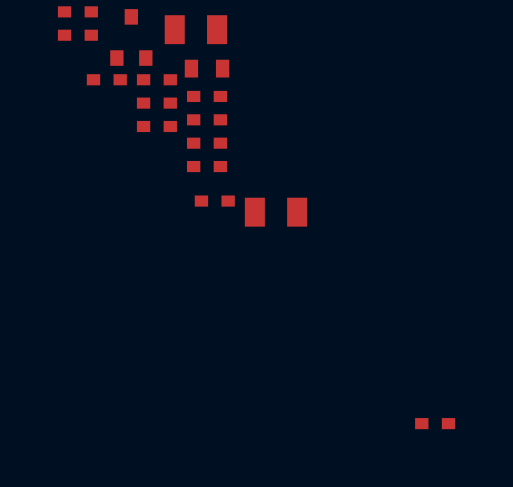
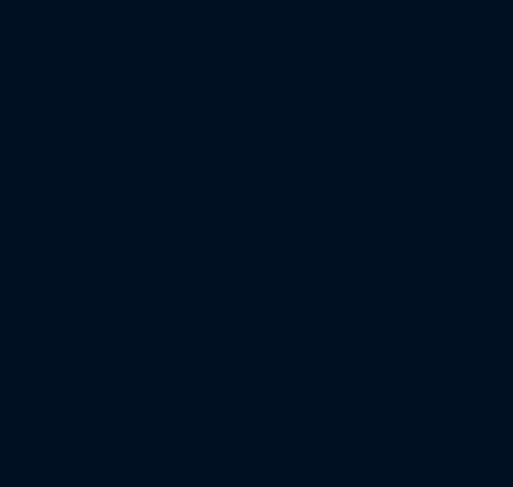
part: (77, 11) -> none
part: (195, 29) -> none
part: (77, 35) -> none
part: (131, 37) -> none
part: (207, 68) -> none
part: (106, 79) -> none
part: (156, 79) -> none
part: (207, 96) -> none
part: (156, 103) -> none
part: (207, 119) -> none
part: (156, 126) -> none
part: (207, 143) -> none
part: (207, 166) -> none
part: (214, 201) -> none
part: (276, 212) -> none
part: (435, 423) -> none

